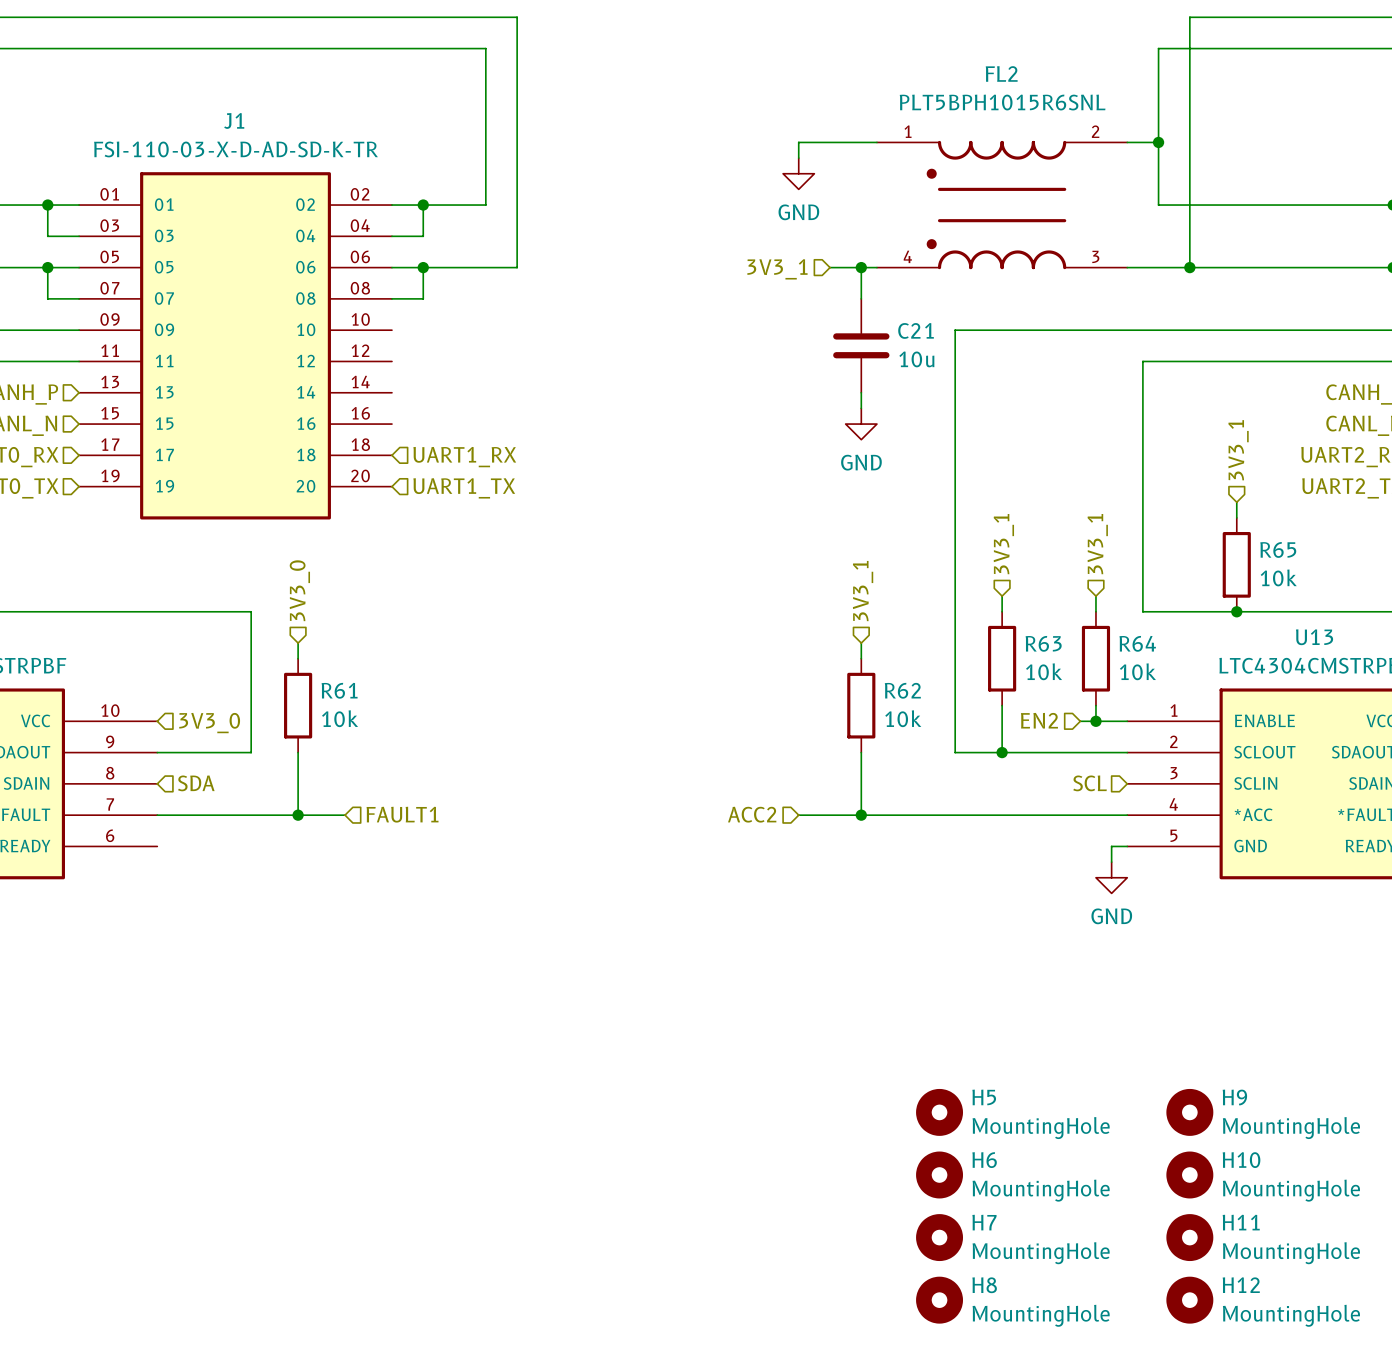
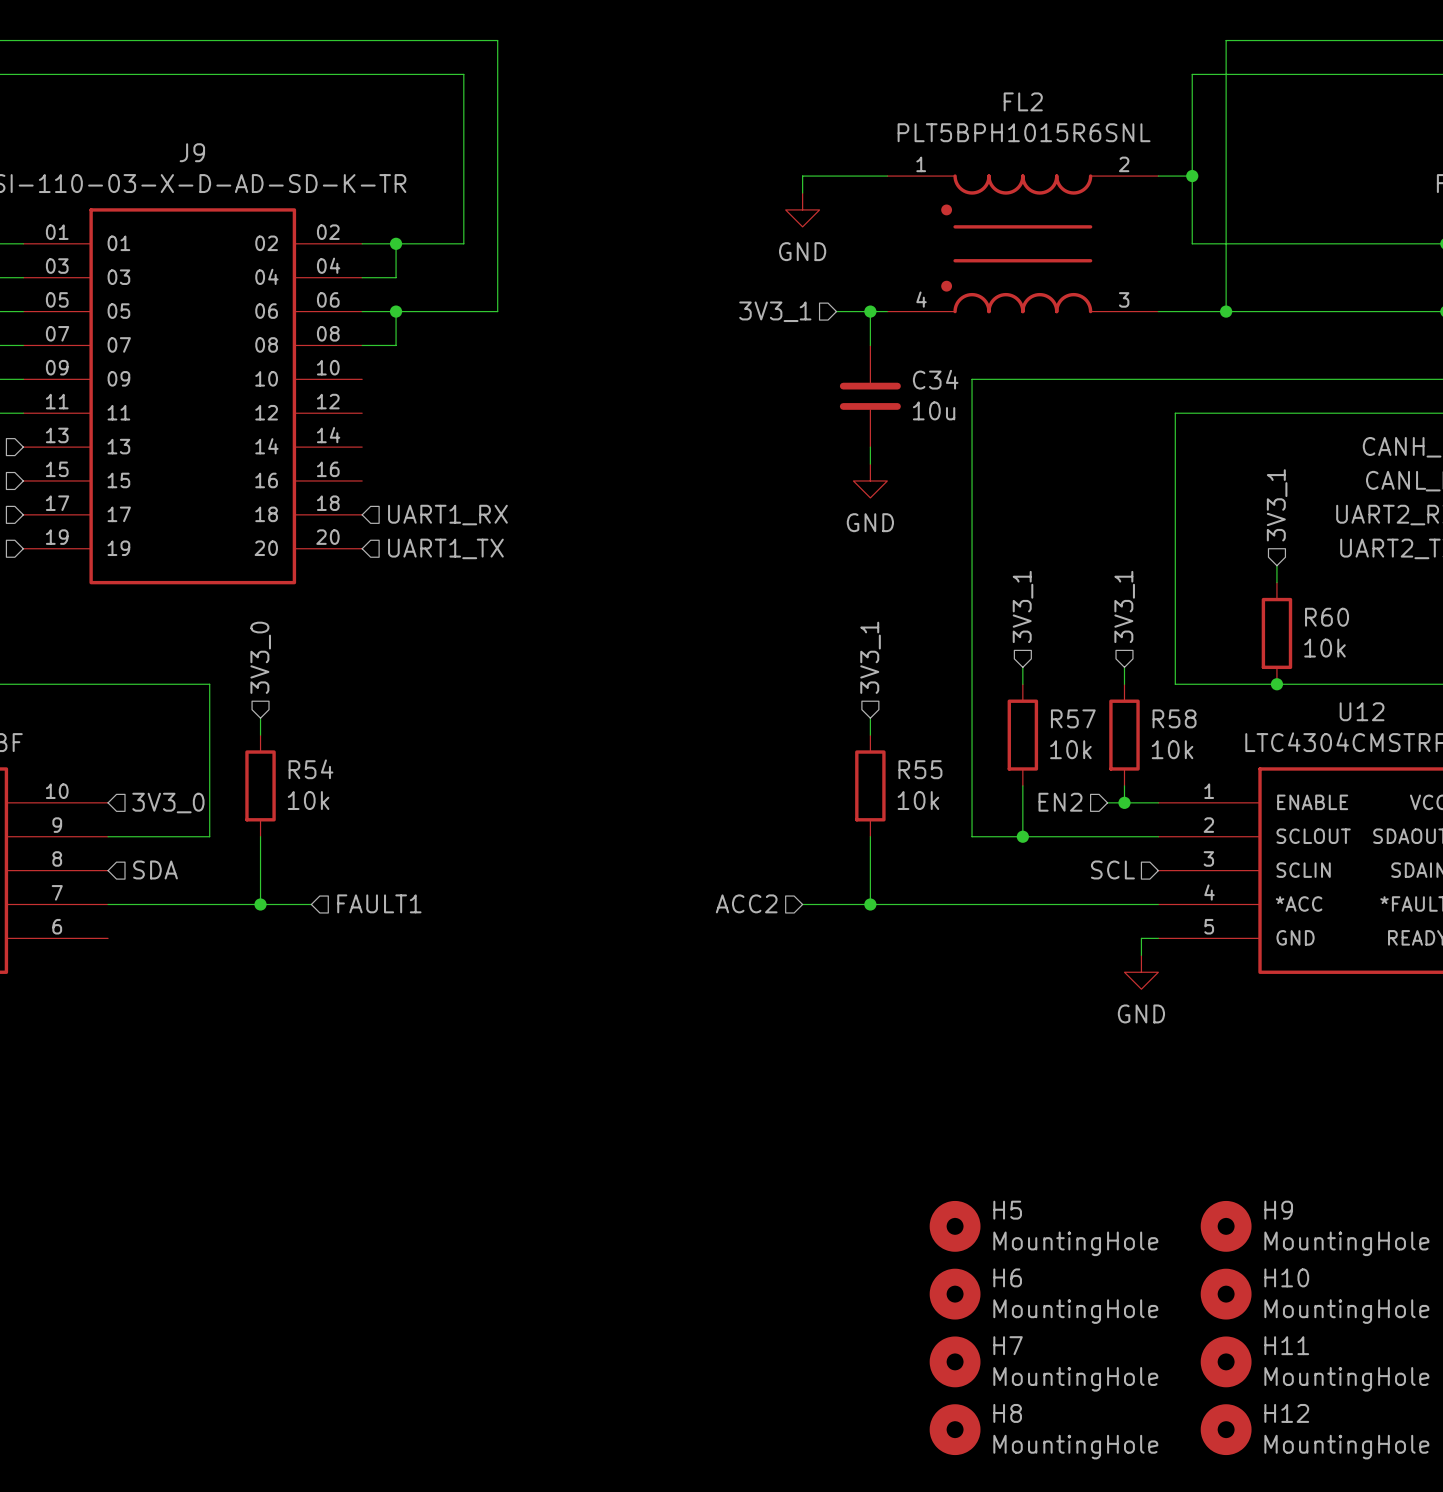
J1 name: J1 (234, 120) -> J9 (192, 152)
C21 name: C21 (916, 330) -> C34 (935, 379)
R65 name: R65 (1278, 549) -> R60 (1327, 617)
U13 name: U13 (1314, 637) -> U12 (1362, 711)
R63 name: R63 (1043, 643) -> R57 (1073, 718)
R64 name: R64 (1137, 643) -> R58 (1174, 718)
R61 name: R61 (339, 690) -> R54 (310, 769)
R62 name: R62 (902, 690) -> R55 (920, 769)

